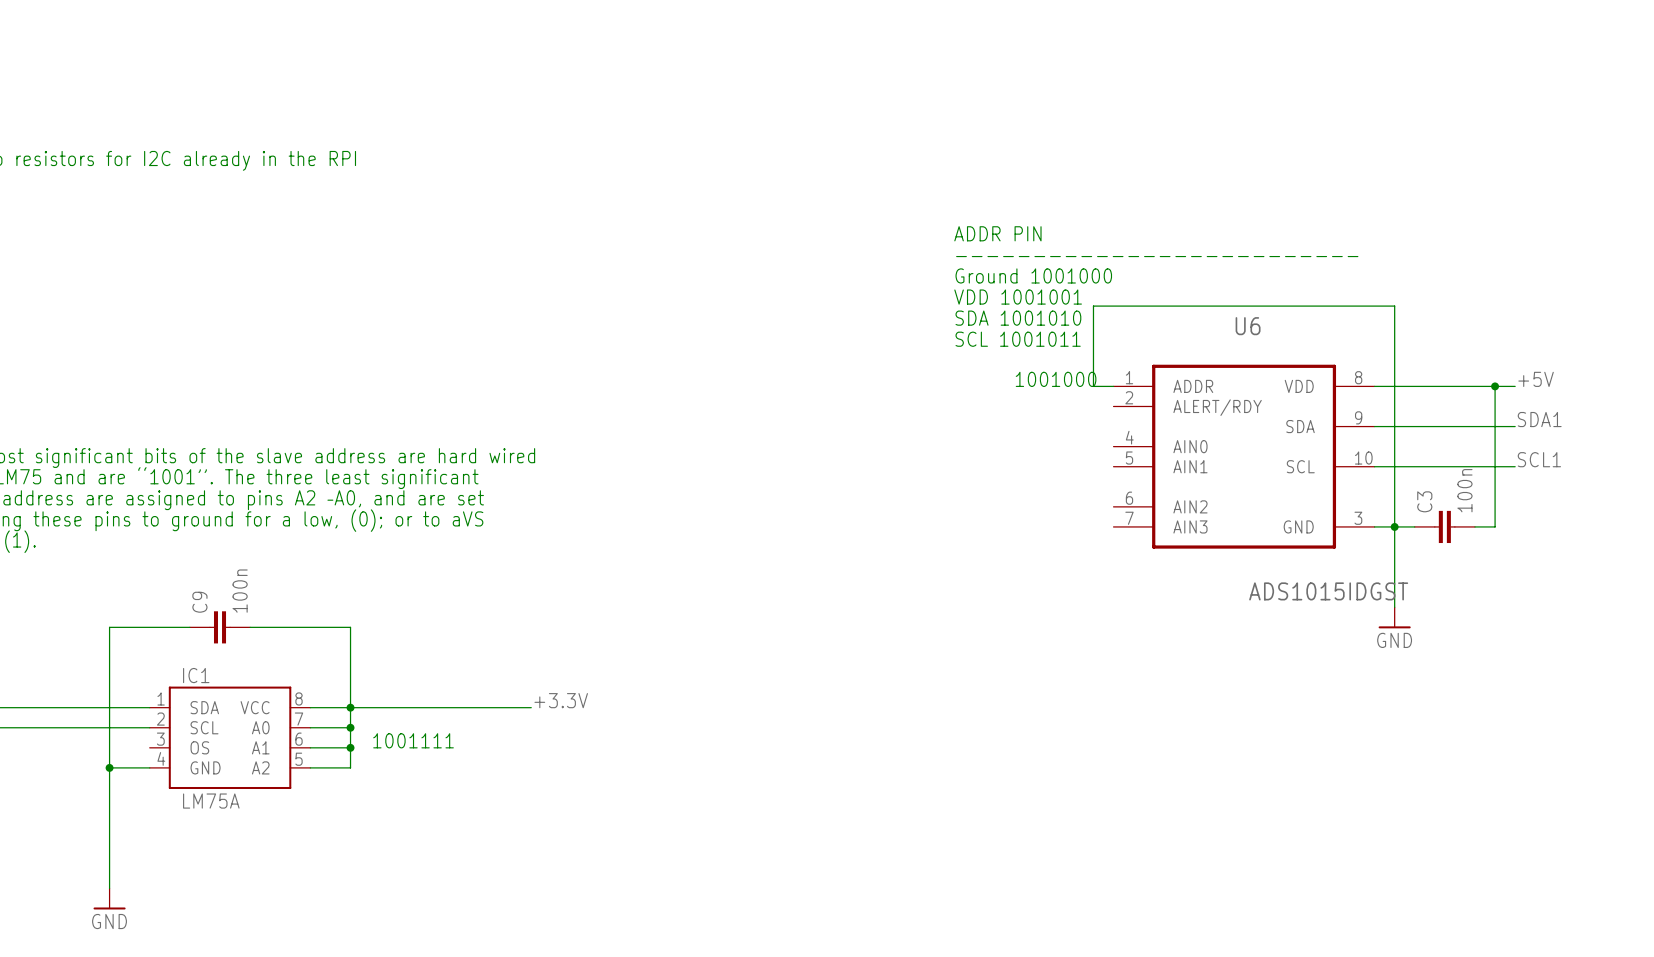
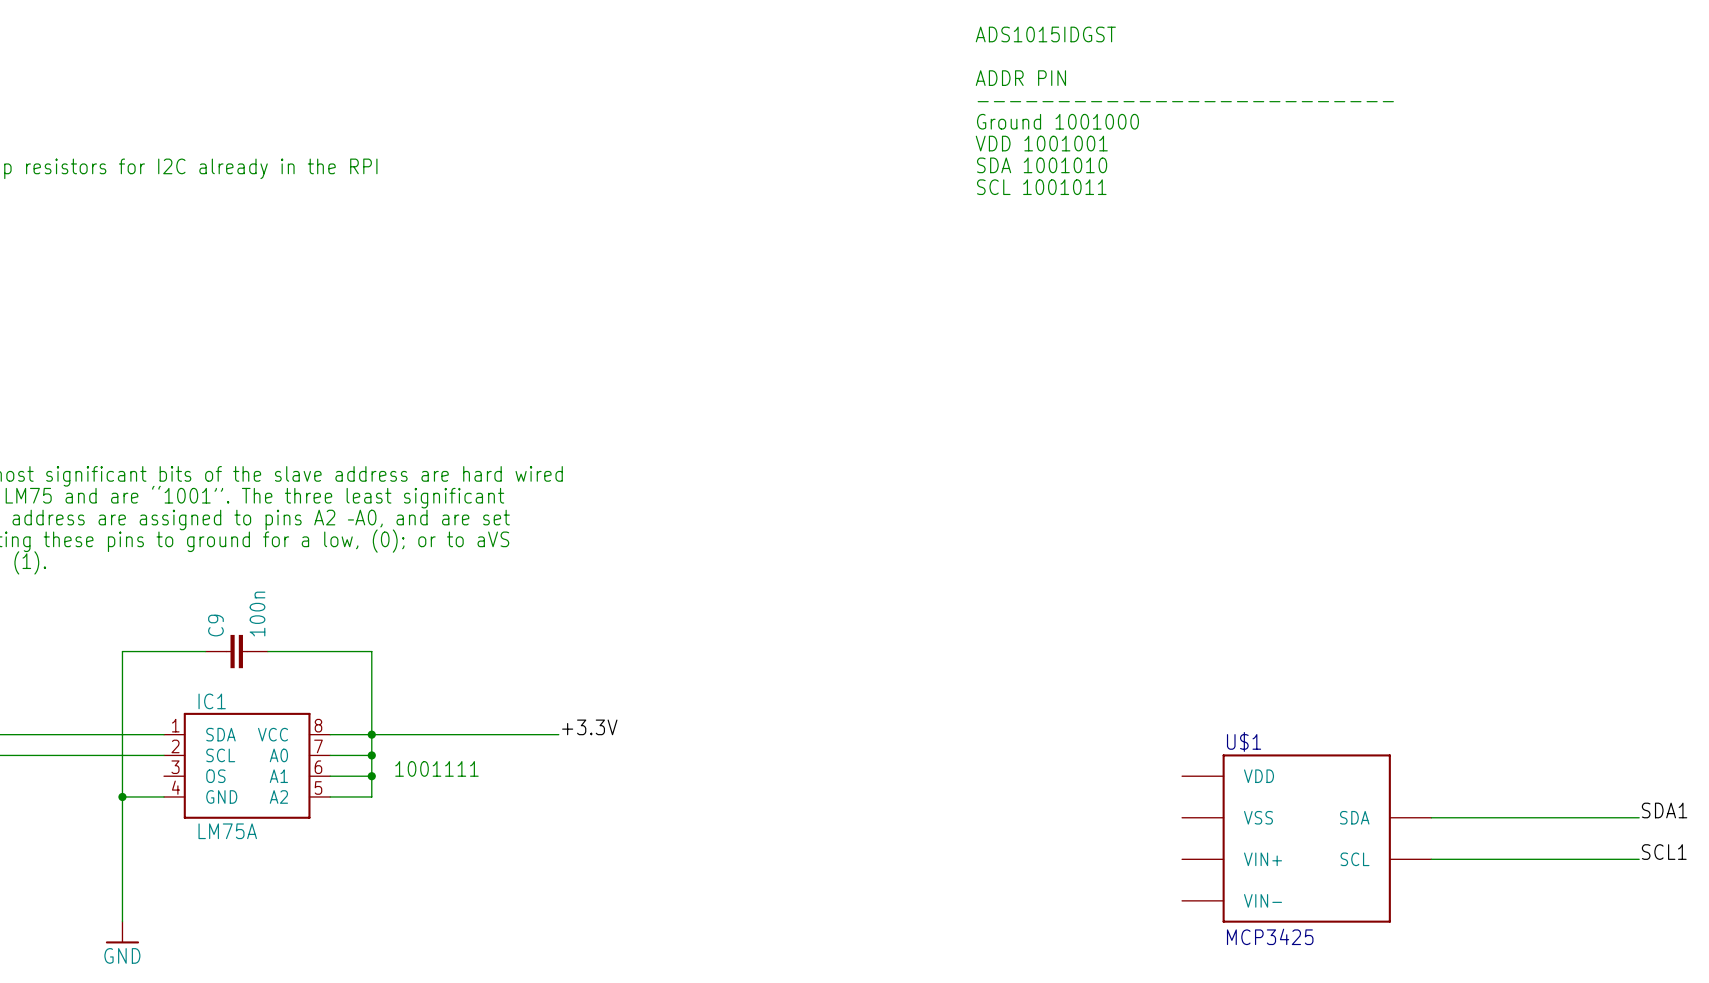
text: none -> ADS1015IDGST (1045, 34)
text position: ADDR PIN (997, 233) -> ADDR PIN (1020, 78)
text position: -------------------------- (1157, 256) -> -------------------------- (1185, 101)
text position: Ground 1001000 (1033, 275) -> Ground 1001000 (1057, 121)
text position: VDD 1001001 (1018, 297) -> VDD 1001001 (1041, 143)
text position: SDA 1001010 (1018, 318) -> SDA 1001010 (1042, 165)
text position: SCL 1001011 (1018, 339) -> SCL 1001011 (1041, 187)
text: 1001000 (1056, 379) -> none
label: +5V (1536, 379) -> none
wire: (1113, 386) (1093, 386) (1093, 306) (1394, 306) (1394, 607) -> none
wire: (1374, 386) (1515, 386) -> none
wire: (1495, 386) (1495, 526) (1474, 526) -> none
junction: (1495, 386) -> none
label: SDA1 (1539, 419) -> none
wire: (1374, 426) (1515, 426) -> none
U6: ADS1015IDGST (1244, 456) -> none
label: SCL1 (1539, 459) -> none
wire: (1374, 466) (1515, 466) -> none
wire: (1374, 526) (1414, 526) -> none
junction: (1394, 526) -> none
C3: 100n (1444, 526) -> none
power symbol: GND (1394, 617) -> none
label: none -> SDA1 (1664, 810)
wire: none -> (1431, 817) (1639, 817)
U$1: none -> MCP3425 (1306, 838)
label: none -> SCL1 (1664, 852)
wire: none -> (1431, 859) (1639, 859)

